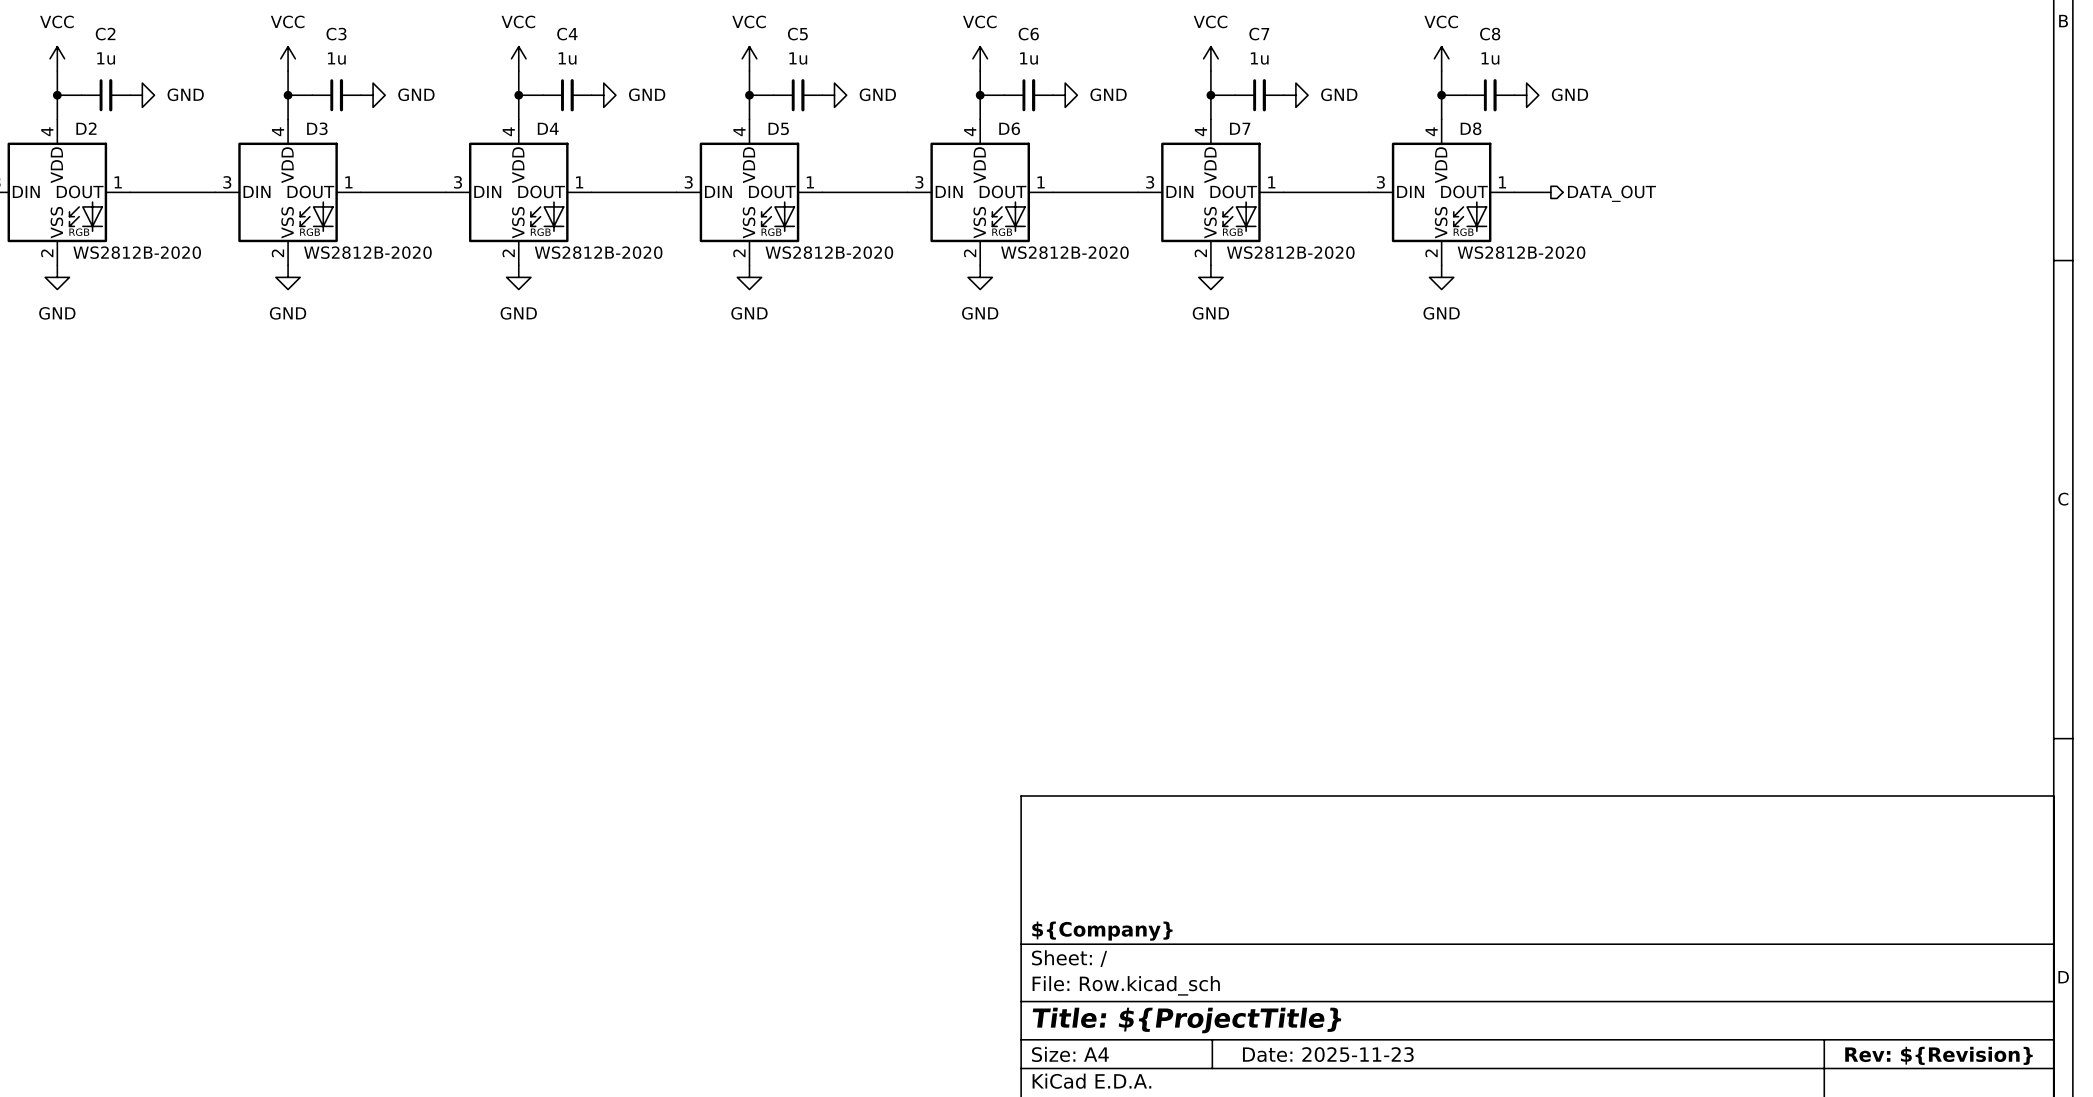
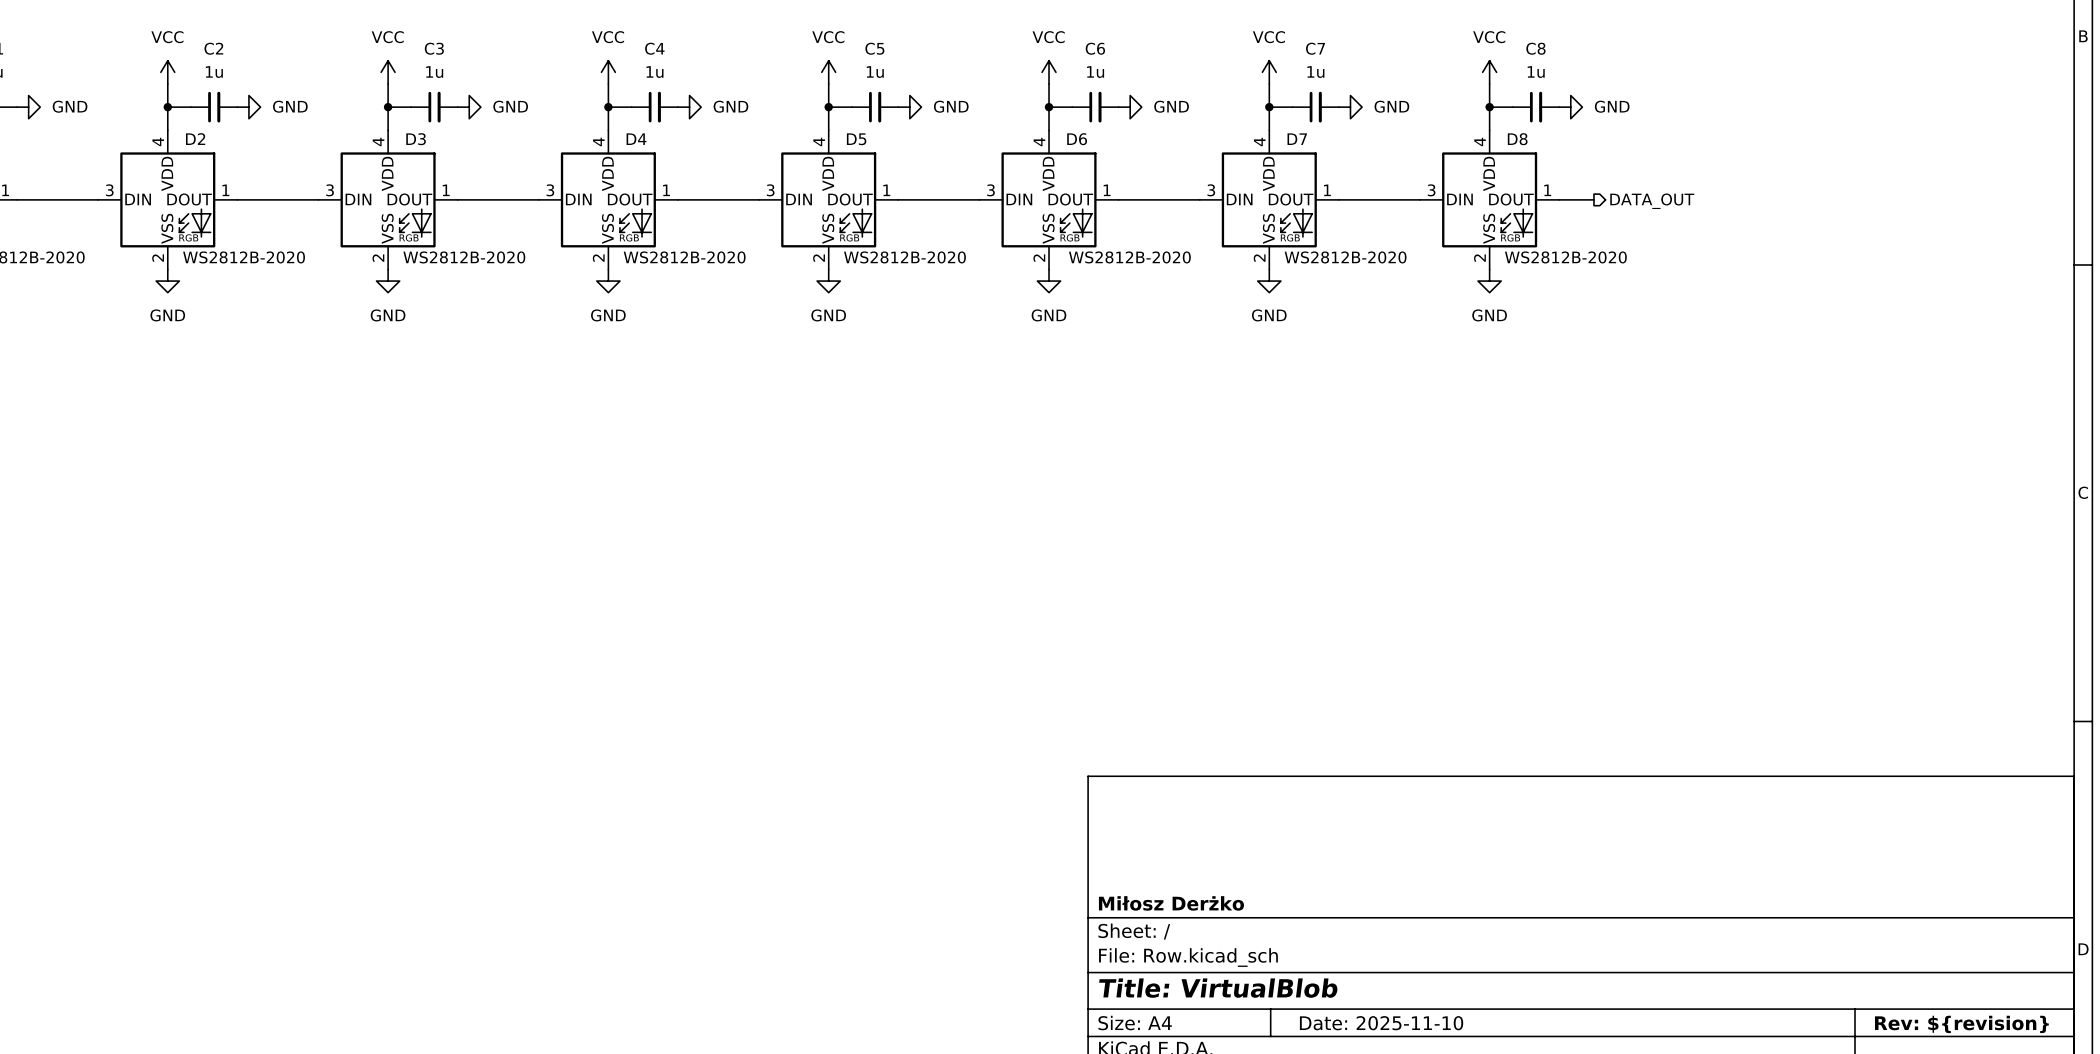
title block: ${Company} (1102, 931) -> Miłosz Derżko (1171, 903)
title block: Title: ${ProjectTitle} (1186, 1020) -> Title: VirtualBlob (1218, 988)
title block: Date: 2025-11-23 (1328, 1054) -> Date: 2025-11-10 (1381, 1023)
title block: Rev: ${Revision} (1938, 1055) -> Rev: ${revision} (1961, 1024)

